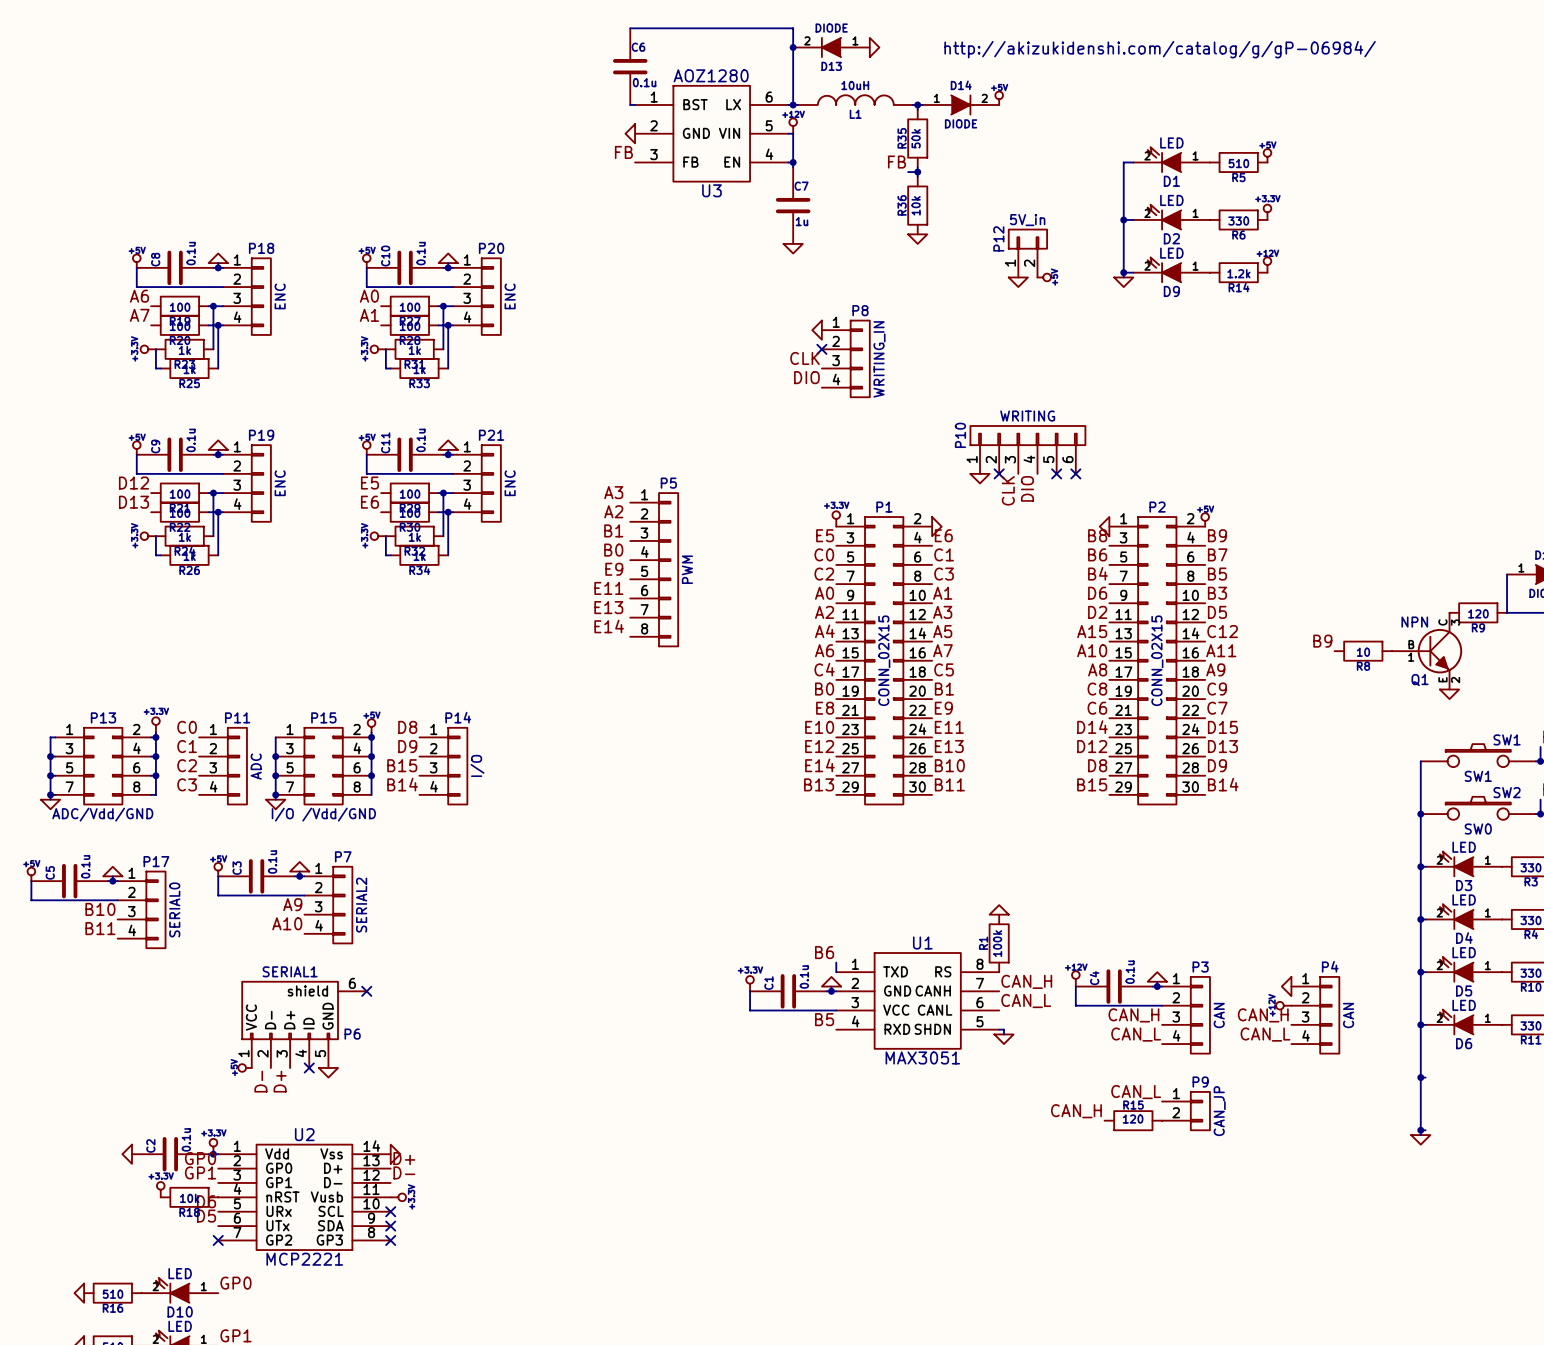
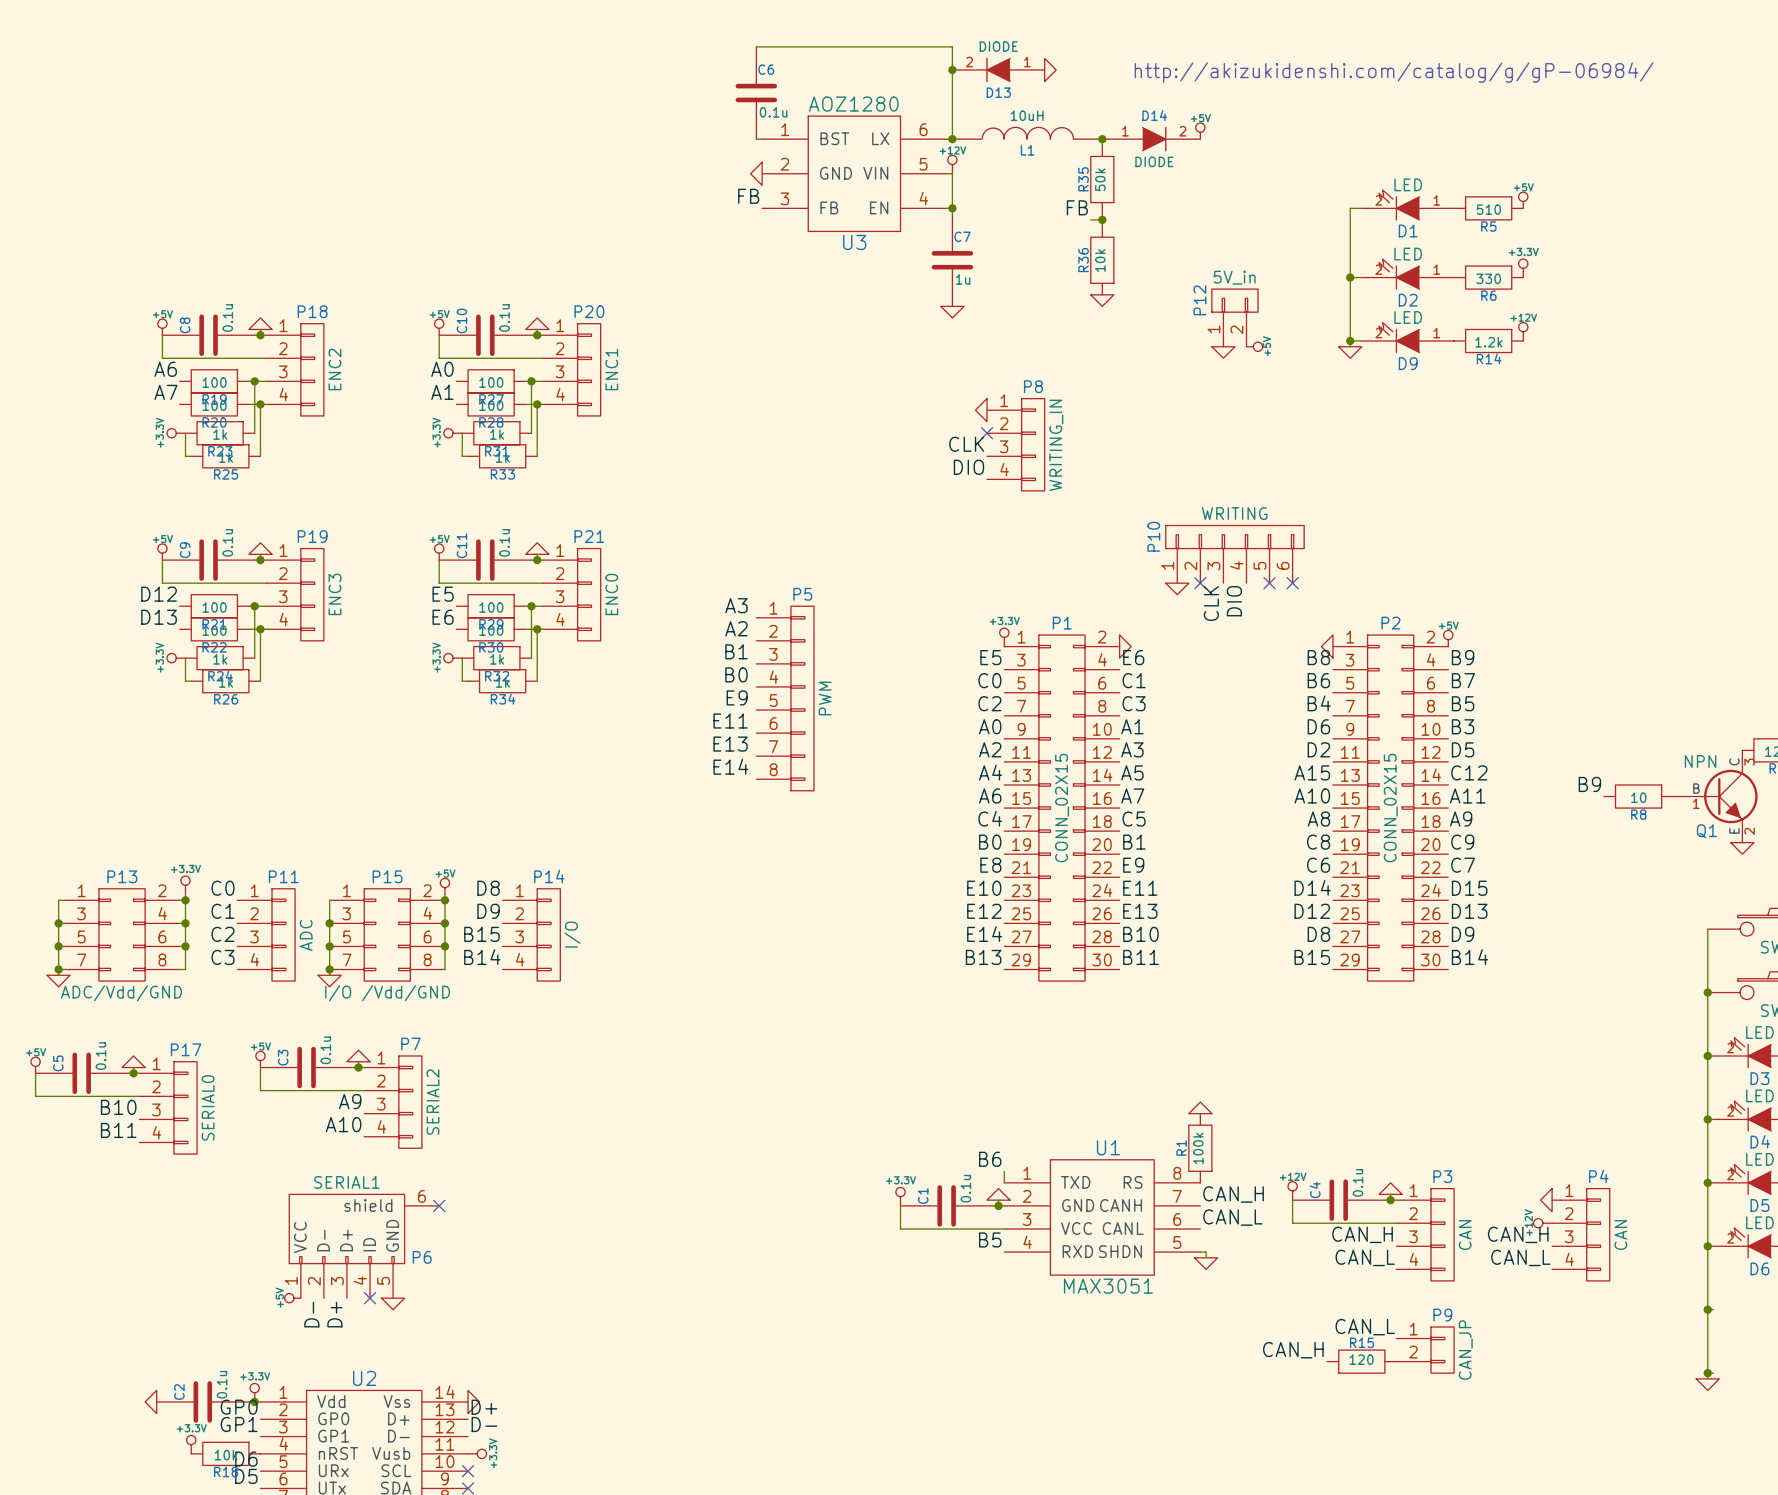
P18 value: ENC (280, 296) -> ENC2 (334, 369)
P20 value: ENC (510, 296) -> ENC1 (611, 369)
P19 value: ENC (280, 483) -> ENC3 (334, 594)
P21 value: ENC (510, 483) -> ENC0 (611, 594)

